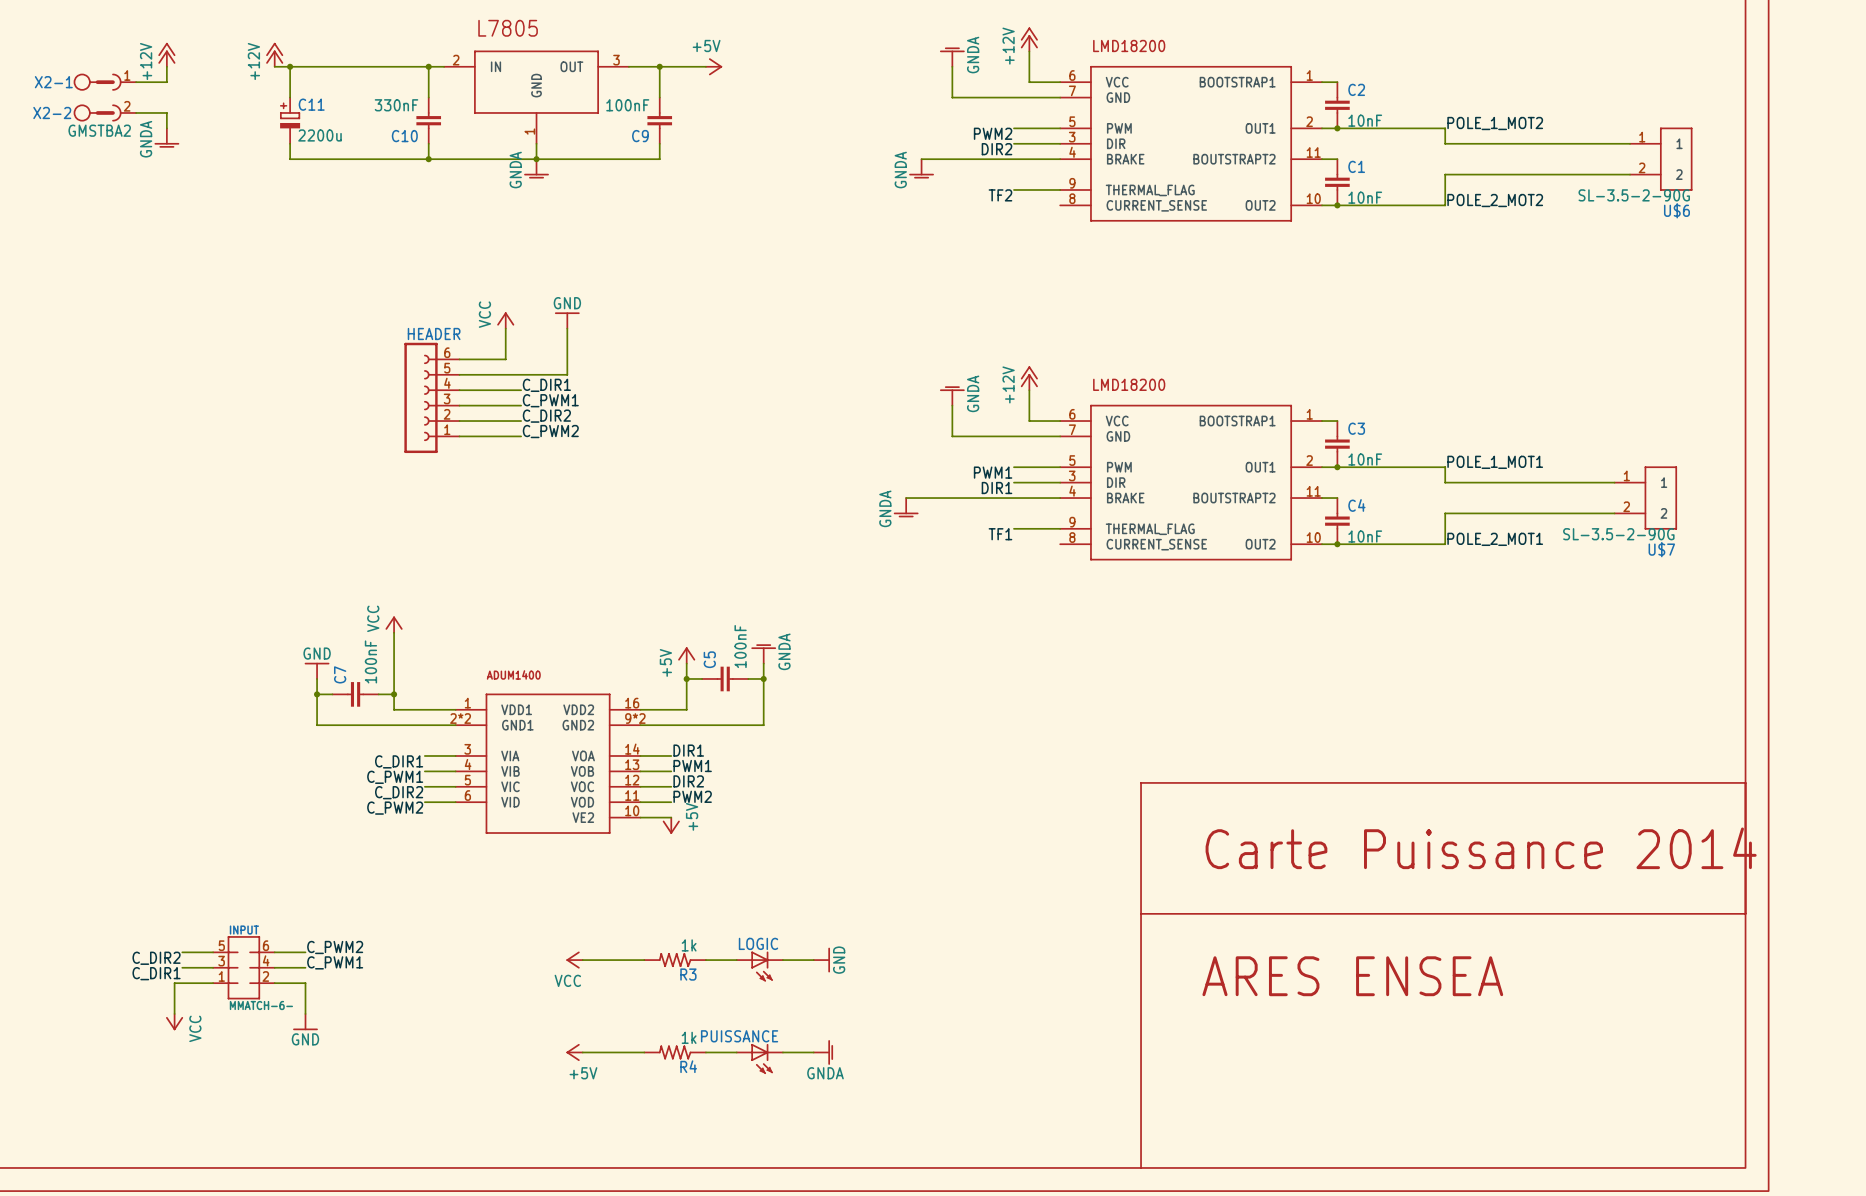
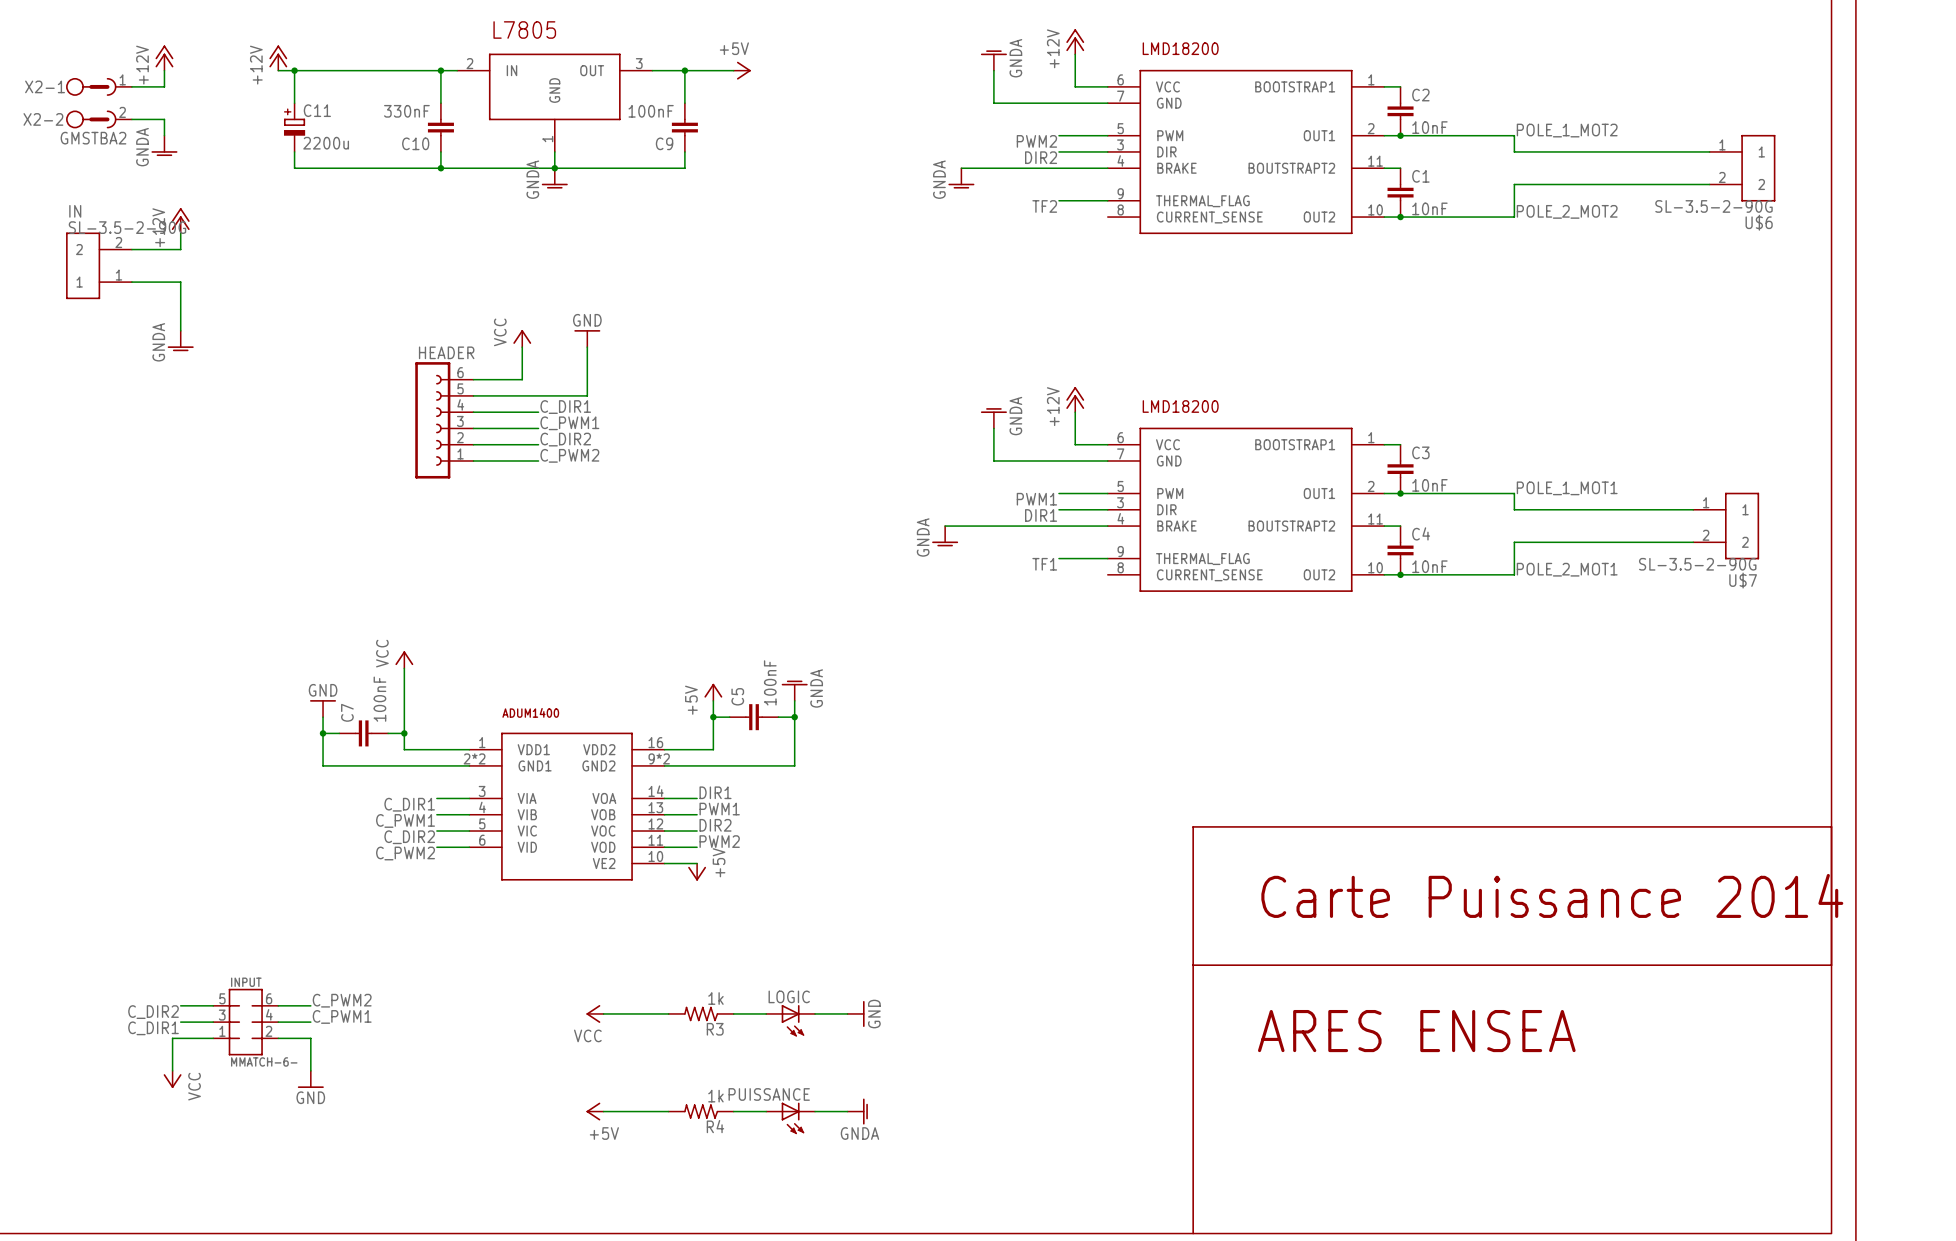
power symbol: none -> +12V (180, 220)
wire: none -> (180, 233) (180, 249) (131, 249)
IN: none -> SL-3.5-2-90G (98, 265)
wire: none -> (131, 282) (180, 282) (180, 330)
power symbol: none -> GNDA (180, 341)

